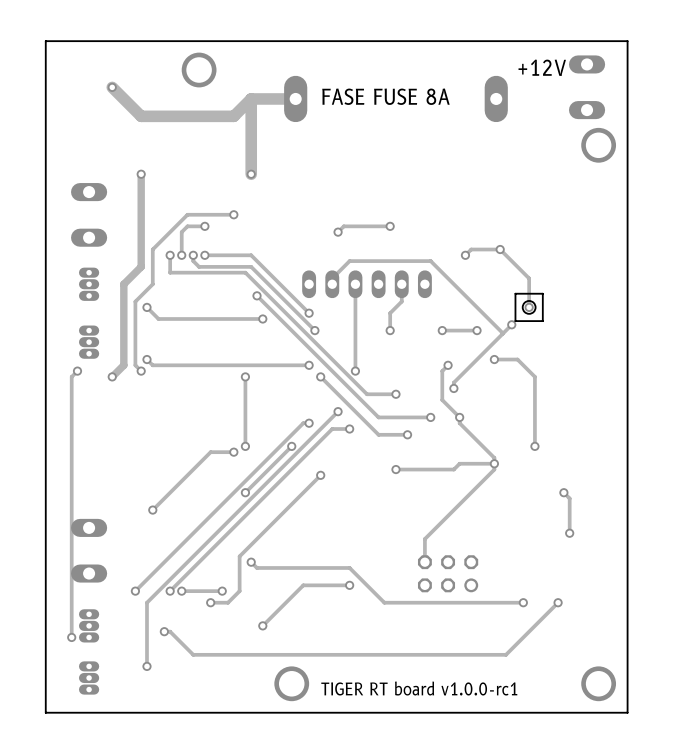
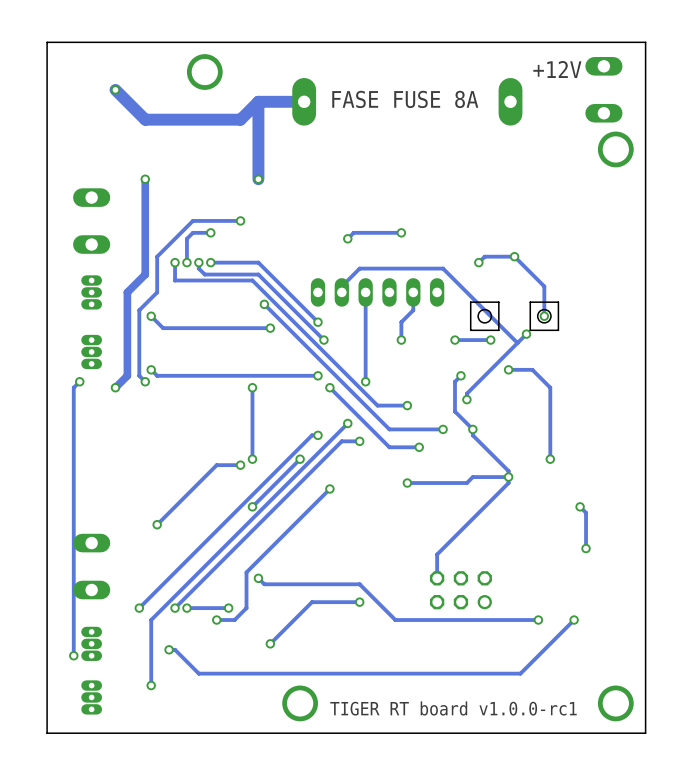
part: none -> (484, 316)

